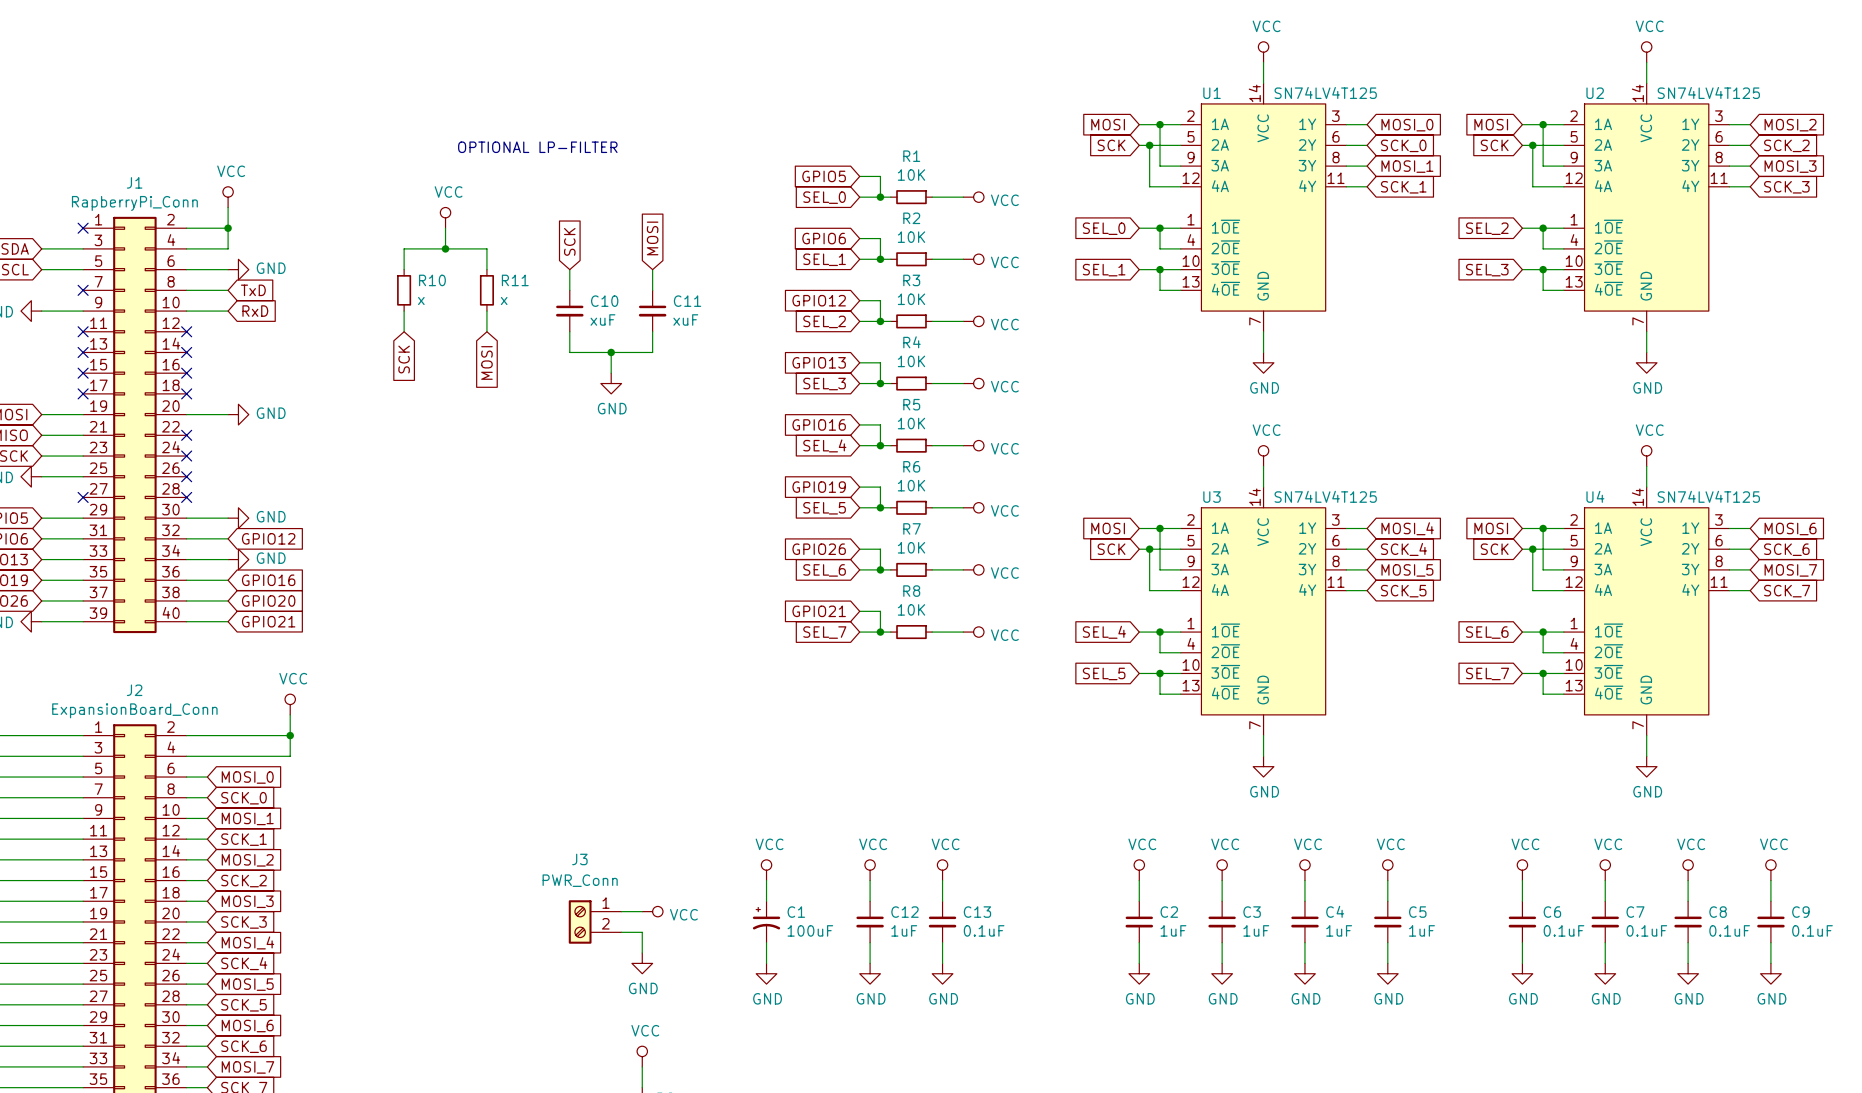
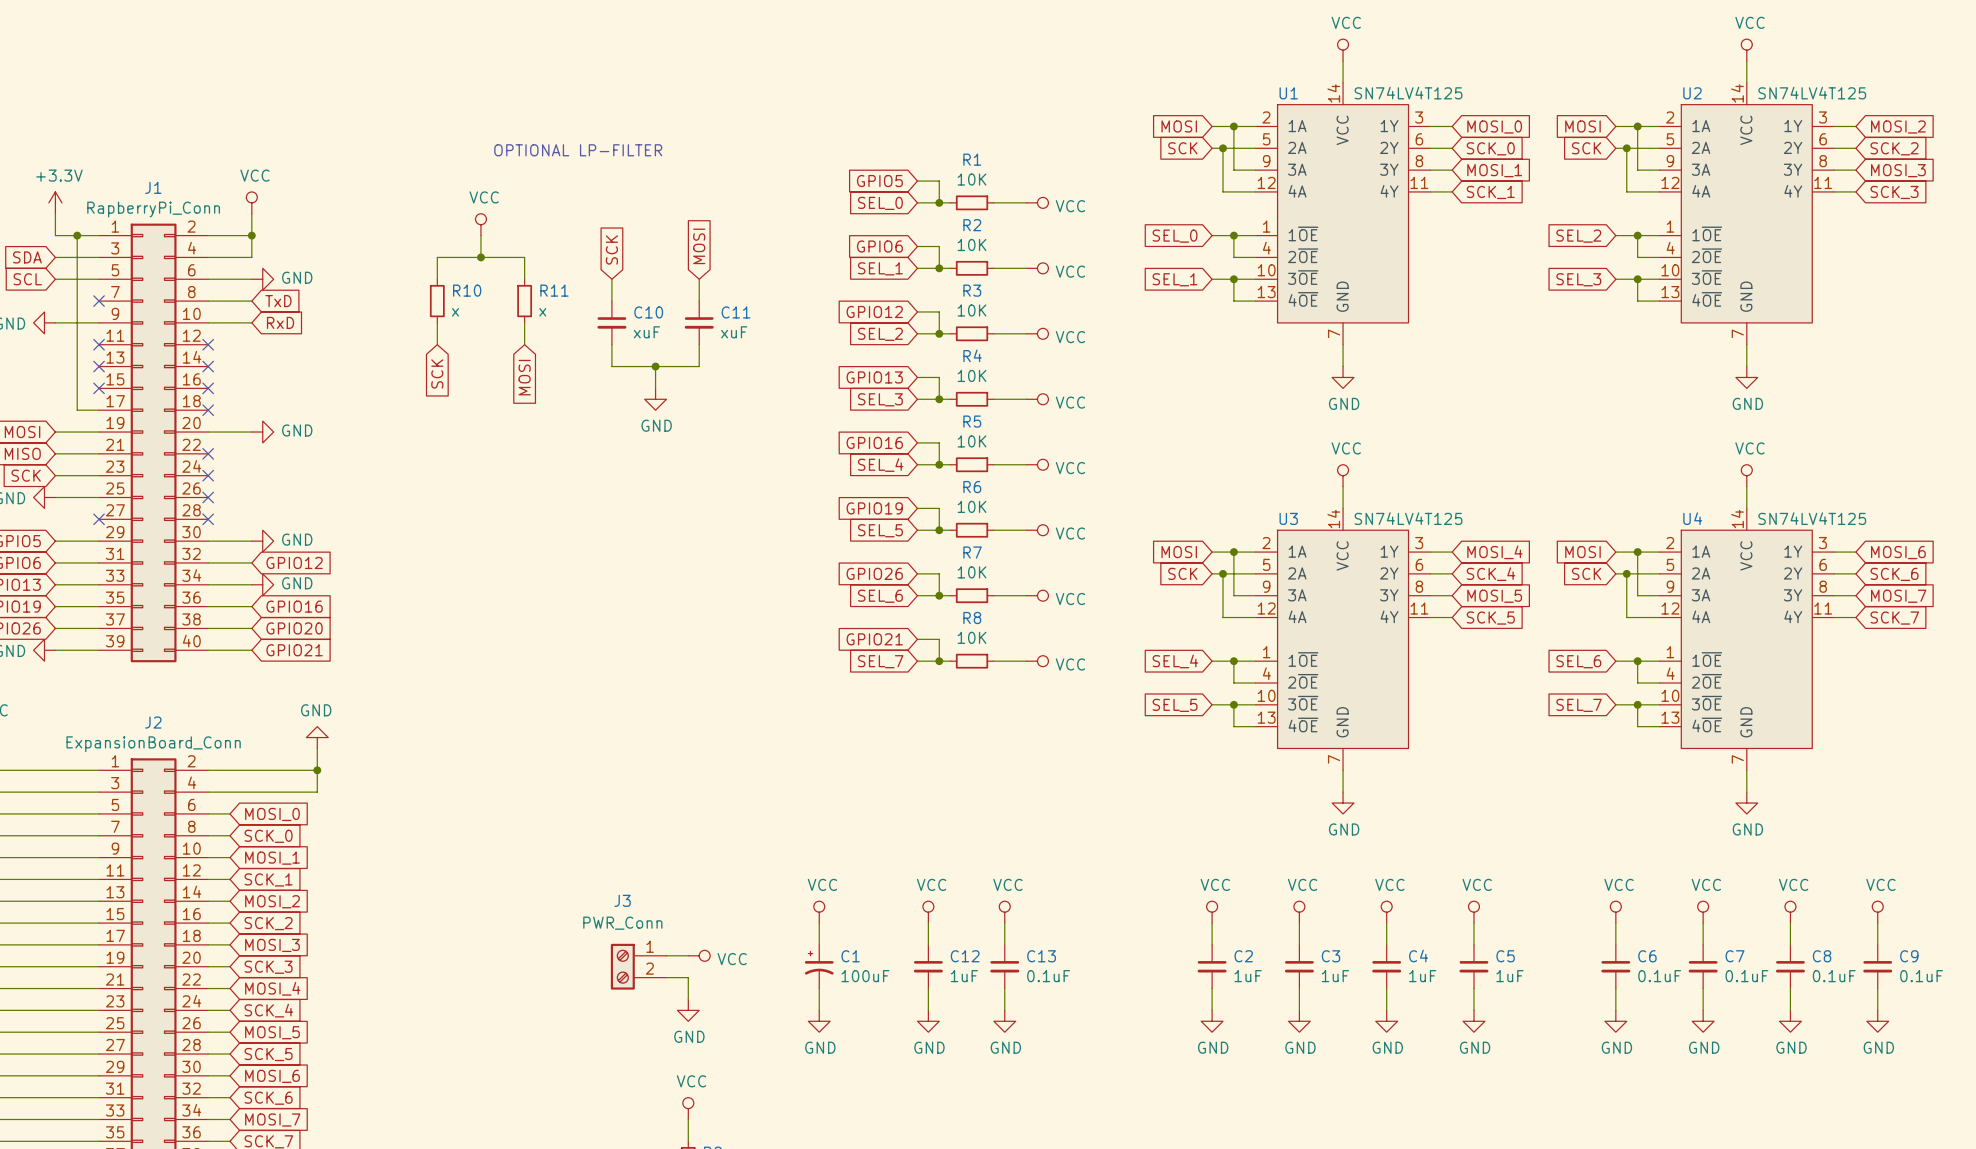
power symbol: none -> +3.3V (55, 202)
wire: none -> (55, 213) (55, 235) (99, 235)
wire: none -> (77, 235) (77, 410) (99, 410)
junction: none -> (77, 235)
no-connect mark: (83, 228) -> none
no-connect mark: (83, 393) -> none
power symbol: VCC (290, 704) -> GND (317, 737)

